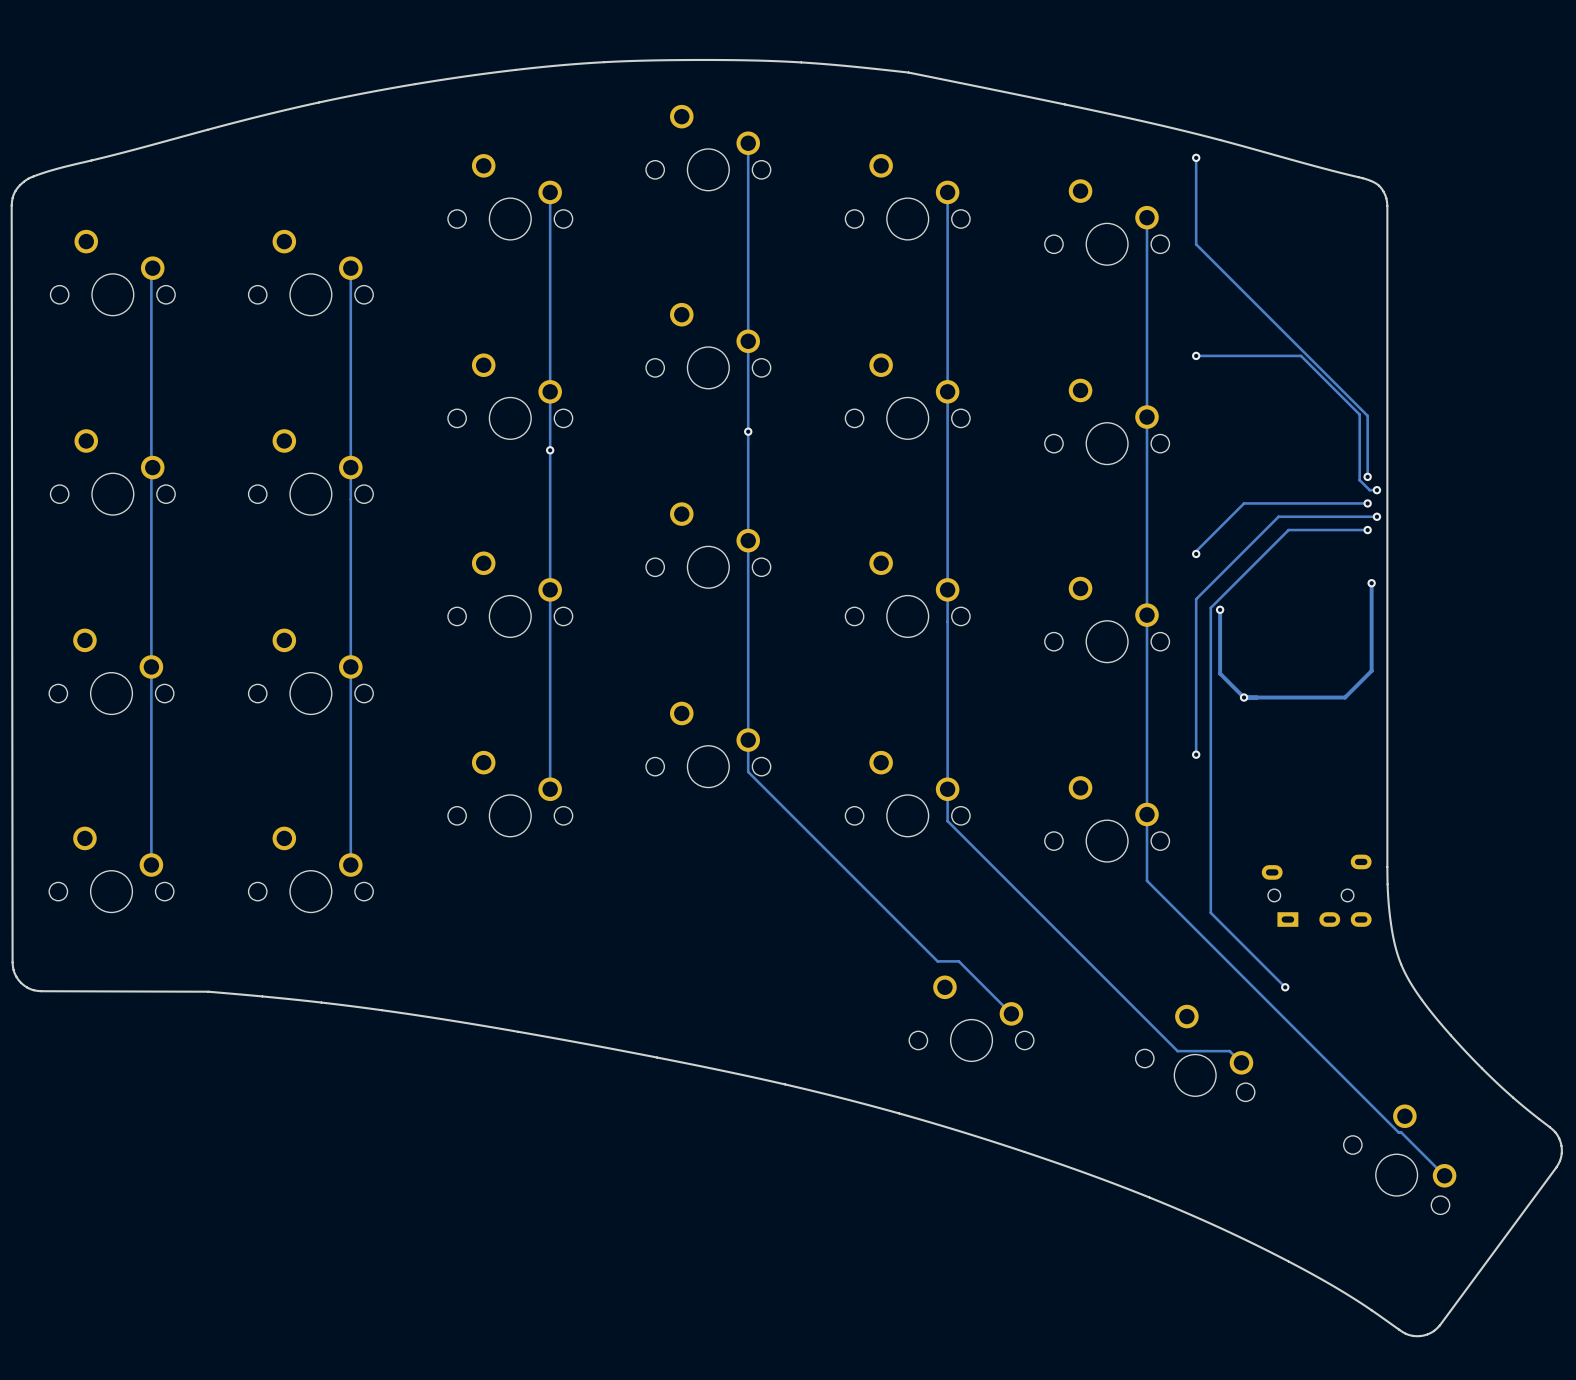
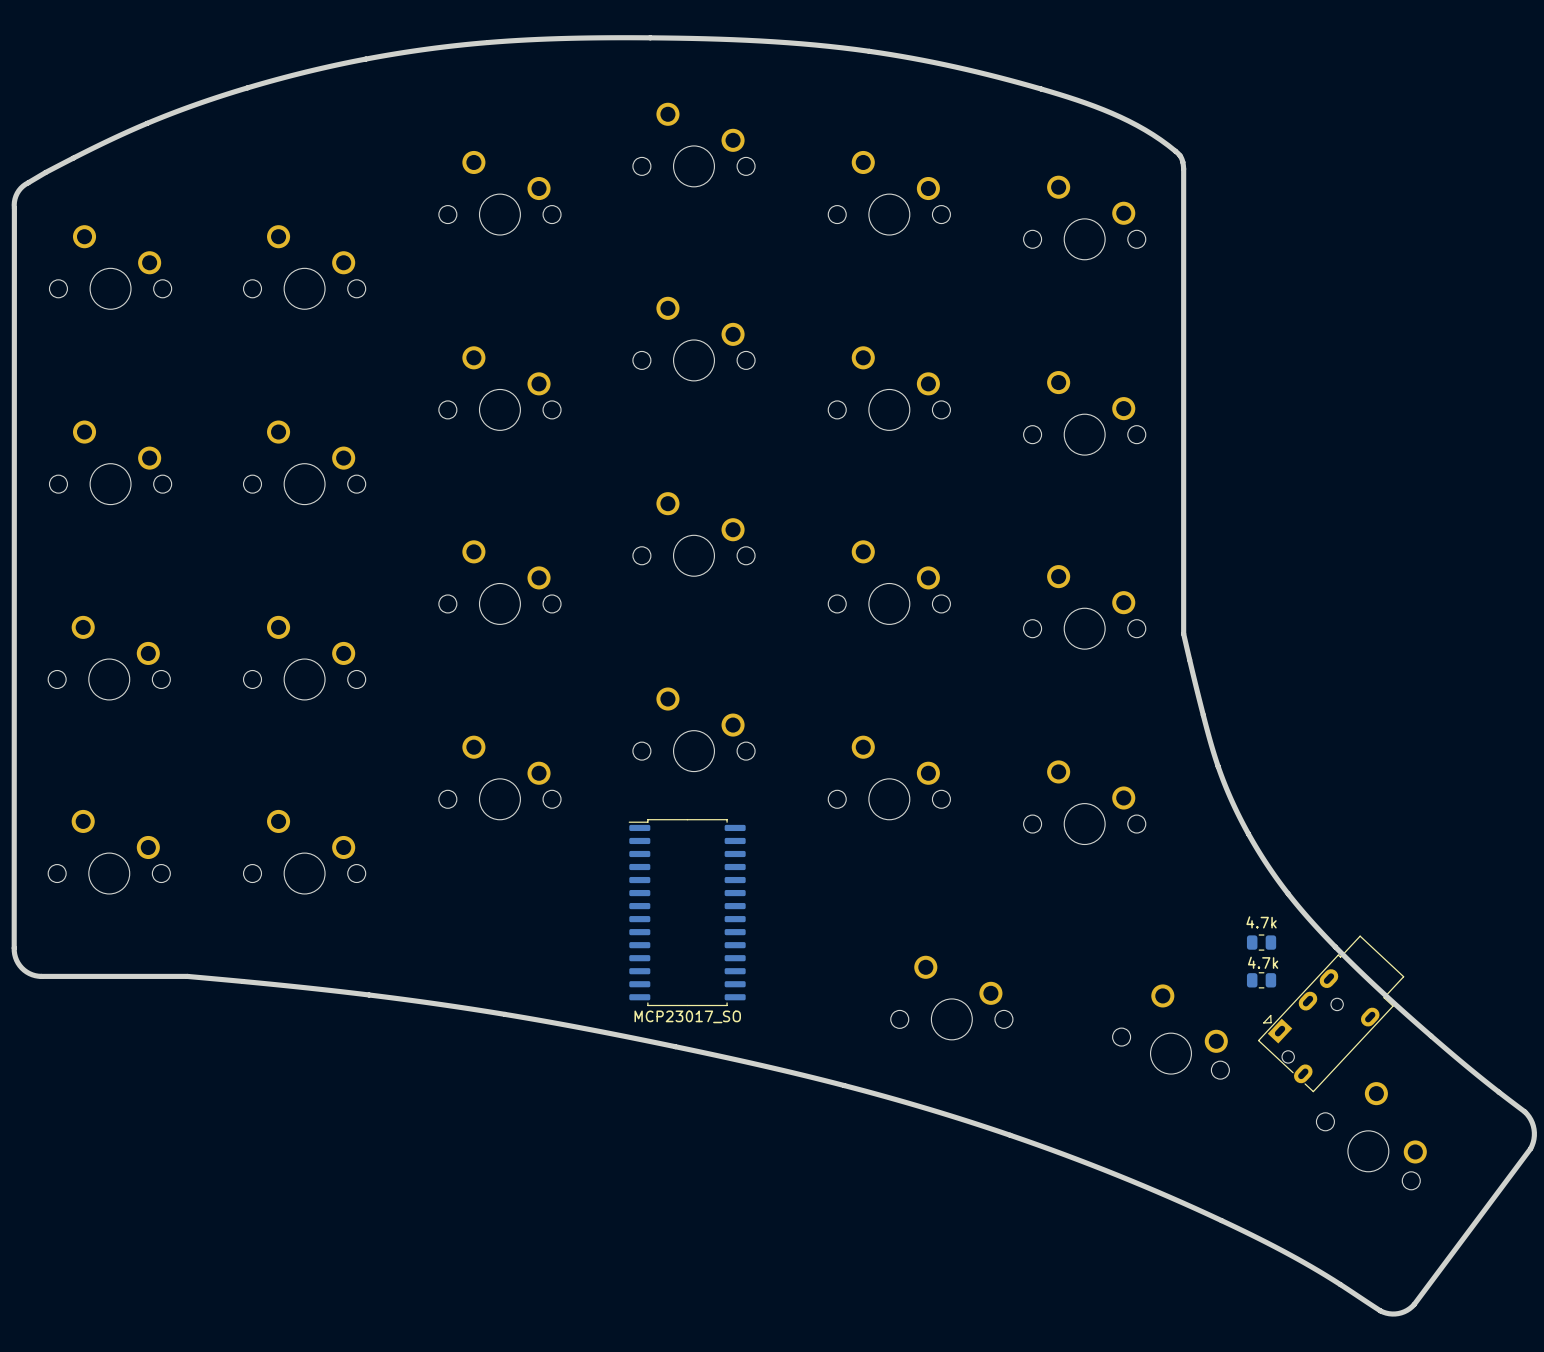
board edge: (693, 59) (801, 62) (908, 72) (1104, 112) (1201, 135) (1365, 179) (1377, 184) (1383, 191) (1387, 206) (1387, 875) (1392, 933) (1404, 971) (1430, 1011) (1489, 1075) (1554, 1131) (1559, 1139) (1561, 1149) (1560, 1158) (1556, 1167) (1439, 1325) (1431, 1332) (1418, 1336) (1405, 1333) (1351, 1297) (1294, 1264) (1219, 1227) (1141, 1194) (993, 1141) (835, 1096) (639, 1054) (407, 1013) (314, 1001) (208, 991) (39, 991) (26, 986) (16, 976) (12, 962) (11, 205) (17, 188) (29, 178) (54, 169) (263, 115) (366, 92) (459, 77) (543, 66) (615, 61) (693, 59) -> (650, 37) (732, 39) (814, 44) (880, 52) (955, 67) (1041, 89) (1103, 109) (1145, 129) (1168, 145) (1180, 156) (1183, 168) (1183, 633) (1205, 724) (1219, 770) (1235, 809) (1257, 849) (1280, 883) (1308, 917) (1346, 958) (1400, 1008) (1468, 1068) (1524, 1111) (1530, 1119) (1534, 1129) (1533, 1139) (1530, 1148) (1414, 1304) (1407, 1310) (1395, 1313) (1380, 1310) (1318, 1271) (1267, 1242) (1182, 1202) (1103, 1169) (969, 1121) (823, 1080) (622, 1035) (445, 1005) (329, 990) (187, 976) (38, 976) (26, 972) (18, 963) (14, 948) (14, 204) (18, 190) (25, 184) (61, 164) (153, 120) (228, 93) (306, 71) (388, 55) (465, 44) (548, 38) (650, 37)
track: (748, 143) (748, 771) (937, 961) (958, 961) (1011, 1013) -> none
track: (1196, 157) (1196, 244) (1367, 415) (1367, 476) -> none
via: (1196, 157) -> none
track: (550, 192) (550, 789) -> none
track: (947, 192) (947, 821) (1177, 1051) (1229, 1051) (1241, 1062) -> none
track: (1147, 217) (1147, 880) (1398, 1132) (1401, 1132) (1444, 1175) -> none
track: (152, 268) (151, 865) -> none
track: (350, 268) (350, 865) -> none
track: (1196, 355) (1301, 355) (1359, 414) (1359, 480) (1369, 490) (1376, 490) -> none
via: (1196, 355) -> none
via: (748, 431) -> none
via: (550, 450) -> none
via: (1367, 476) -> none
via: (1376, 490) -> none
track: (1367, 503) (1244, 503) (1196, 551) (1196, 553) -> none
via: (1367, 503) -> none
track: (1376, 516) (1278, 516) (1196, 599) (1196, 754) -> none
via: (1376, 516) -> none
track: (1367, 530) (1288, 530) (1210, 607) (1210, 912) (1285, 987) -> none
via: (1367, 530) -> none
via: (1196, 553) -> none
track: (1371, 583) (1371, 670) (1345, 697) (1244, 697) (1220, 673) (1220, 609) -> none
via: (1371, 583) -> none
via: (1220, 609) -> none
via: (1244, 697) -> none
via: (1196, 754) -> none
part side: top (1316, 890) -> bottom (1331, 1013)
part: none -> MCP23017_SO (687, 912)
part: none -> 4.7k (1261, 942)
via: (1285, 987) -> none
part: none -> 4.7k (1261, 980)

